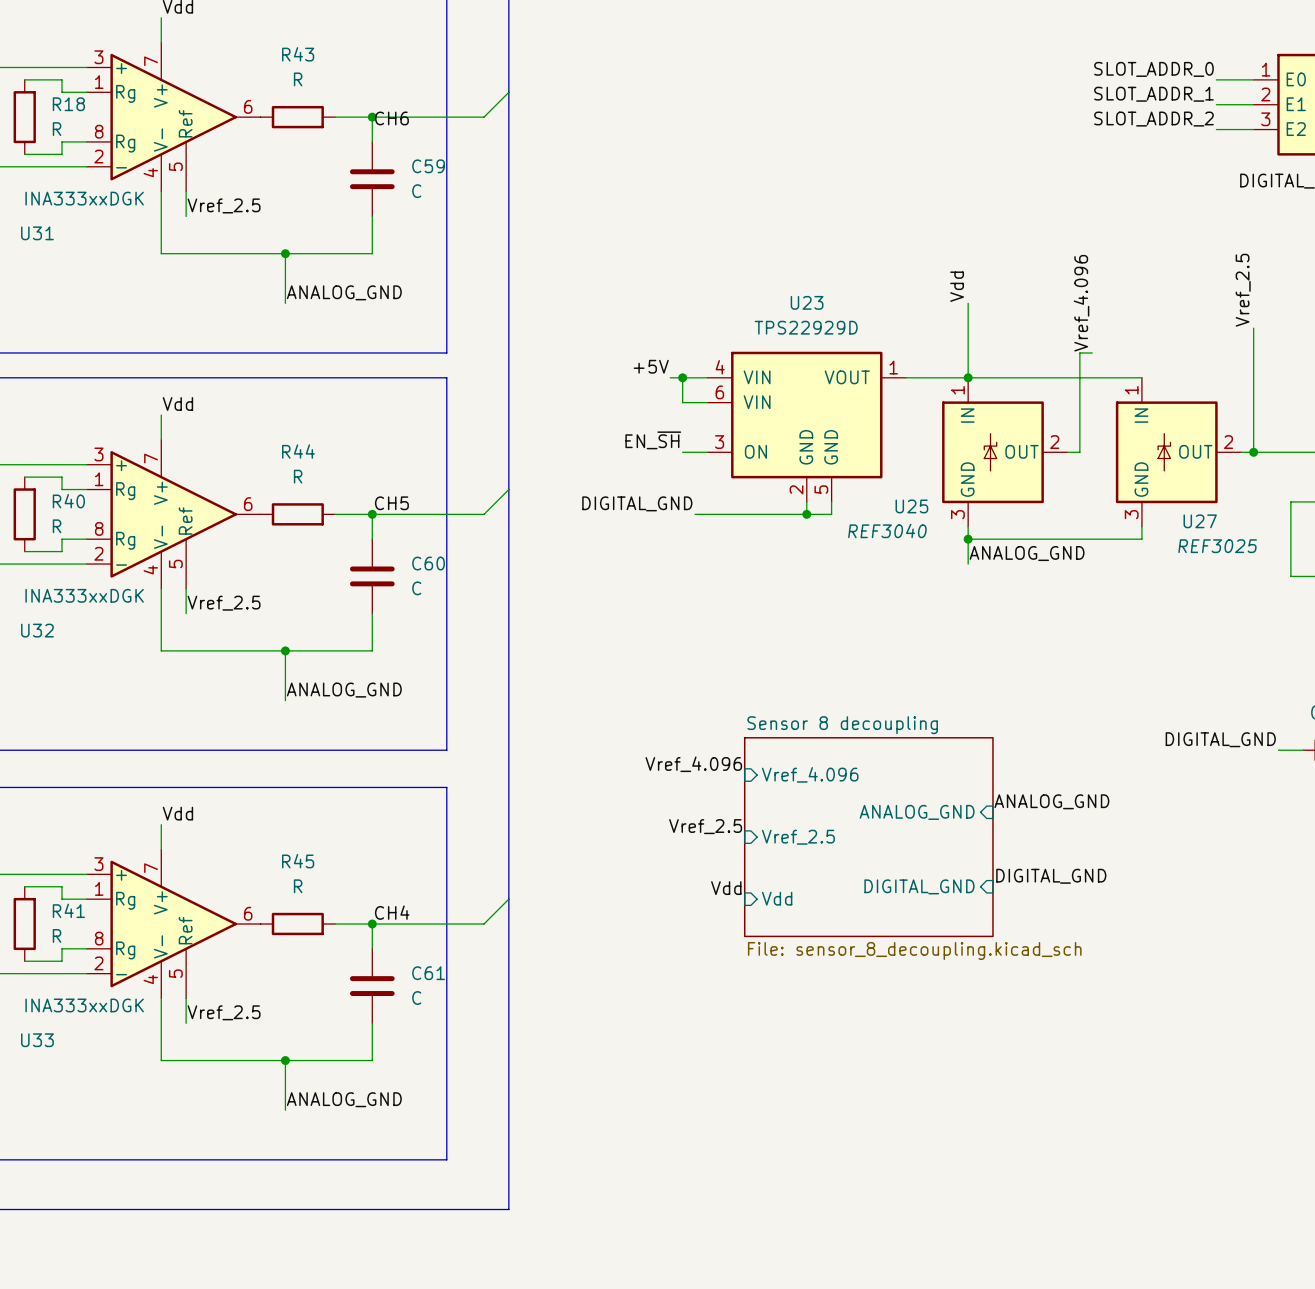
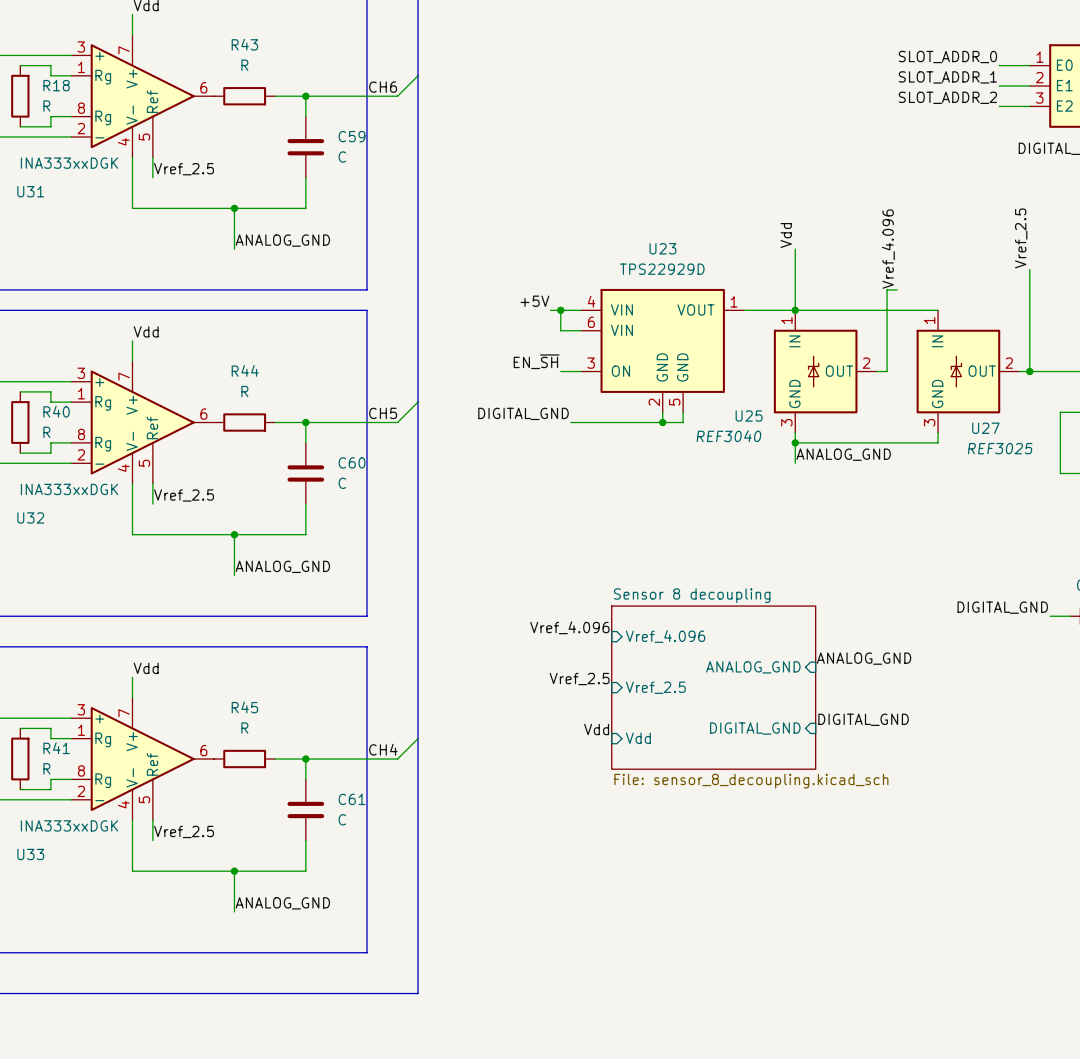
label position: CH6 (391, 118) -> CH6 (383, 87)
label position: CH5 (391, 503) -> CH5 (383, 413)
label position: CH4 (392, 912) -> CH4 (383, 749)

